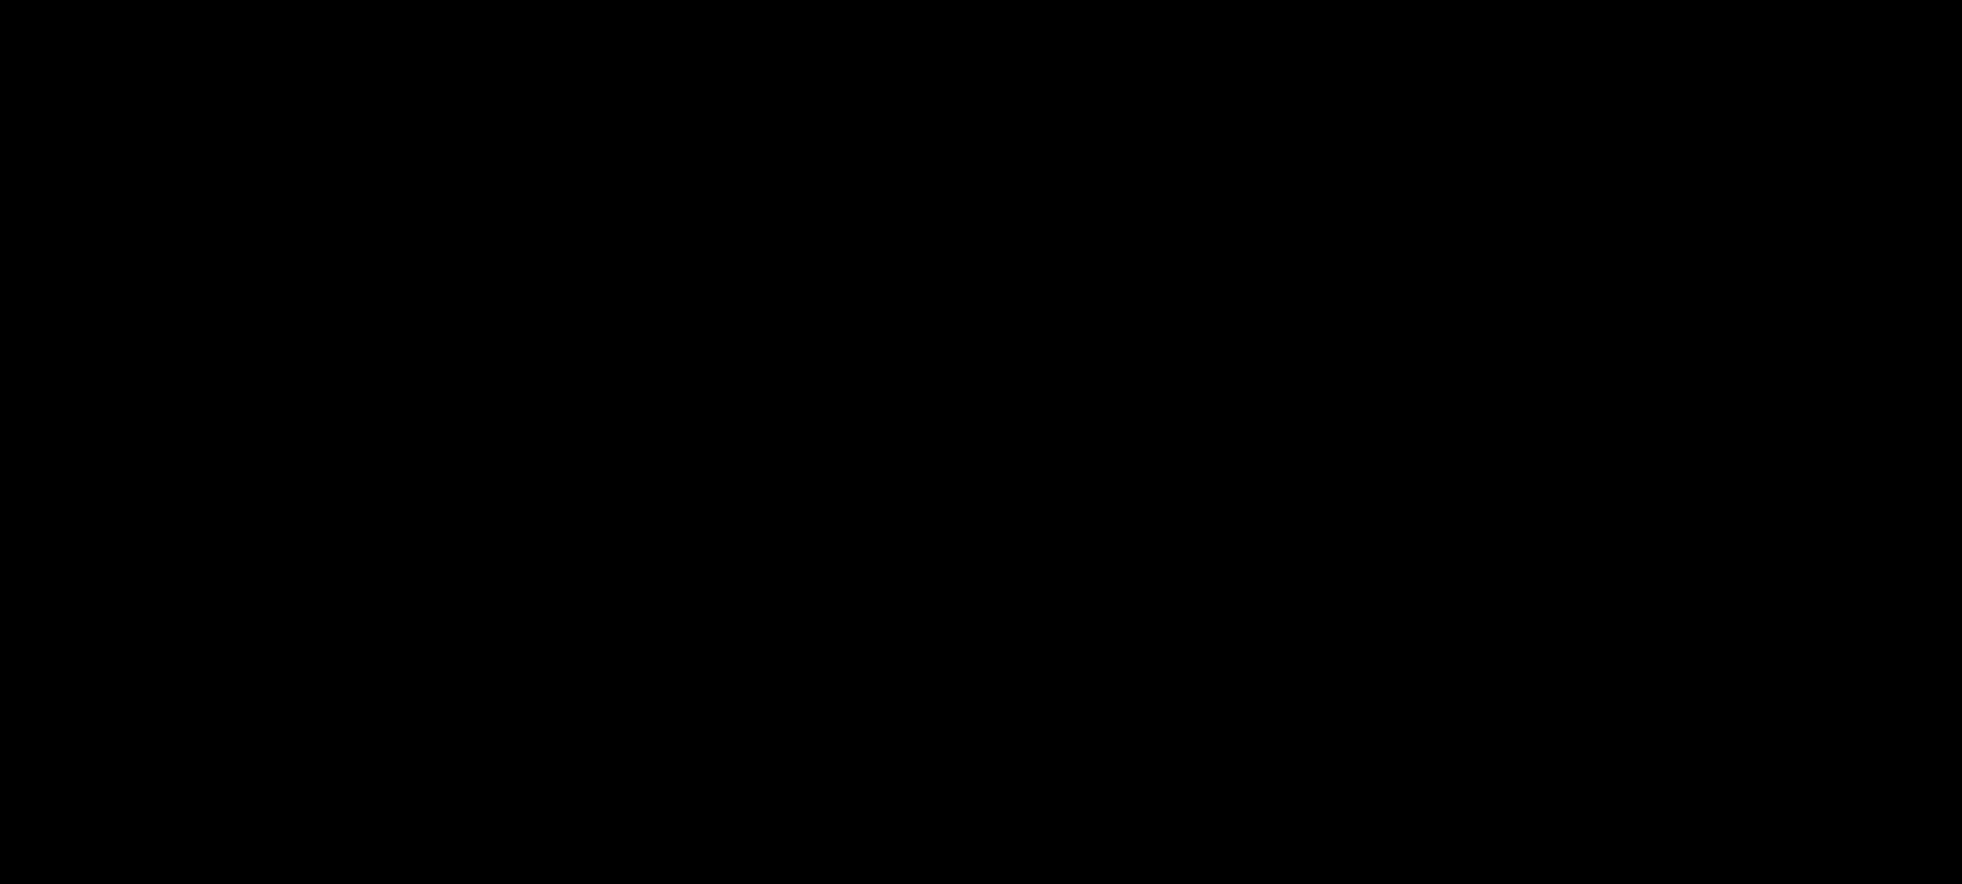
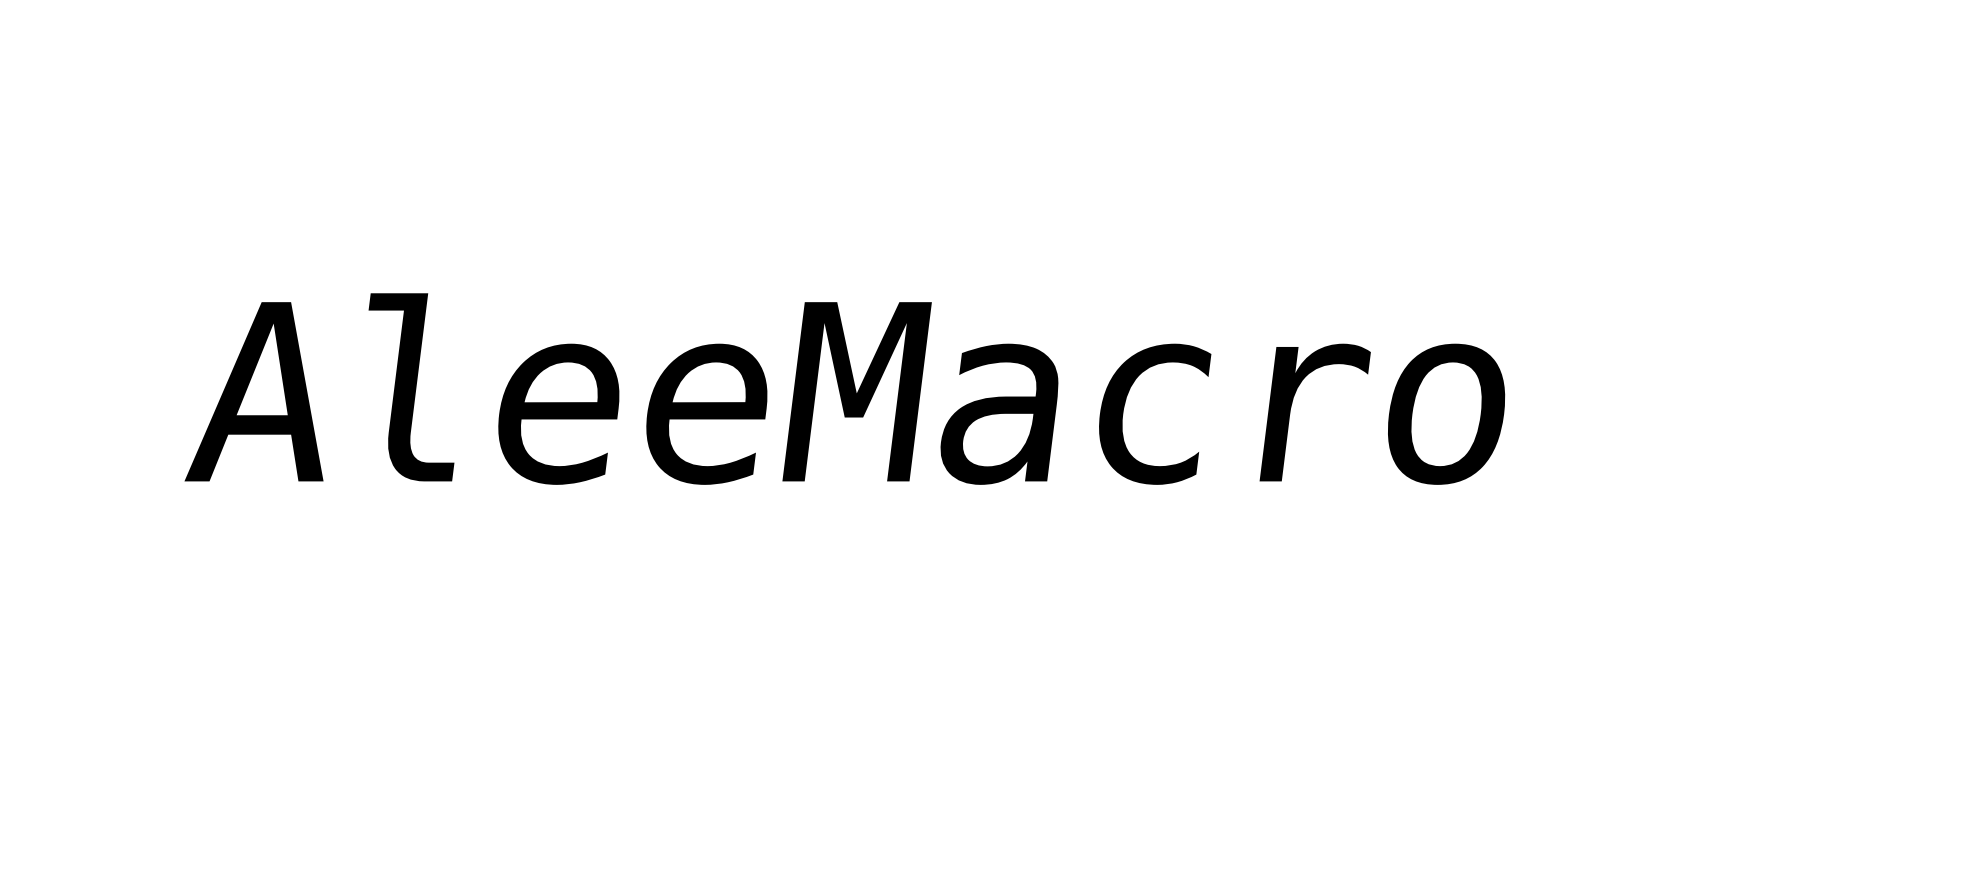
text: none -> AleeMacro (846, 389)

